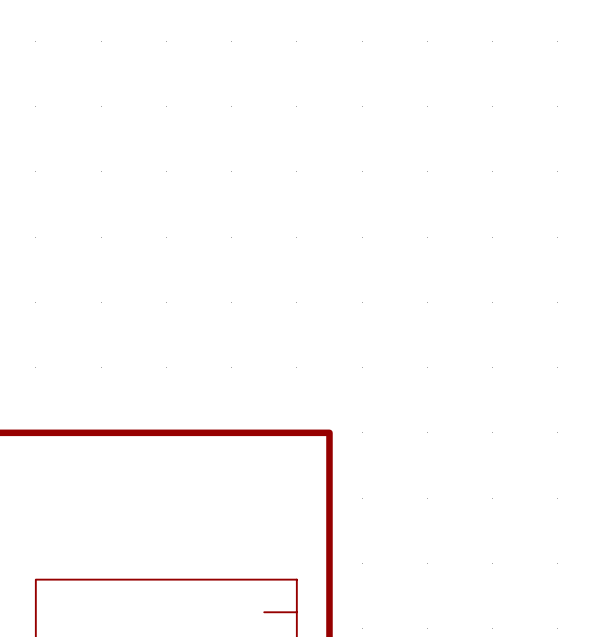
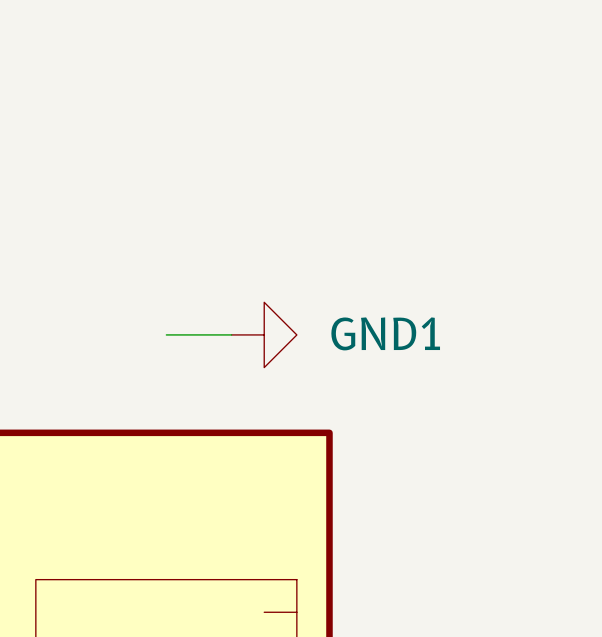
wire: none -> (166, 334) (231, 334)
power symbol: none -> GND1 (264, 334)

